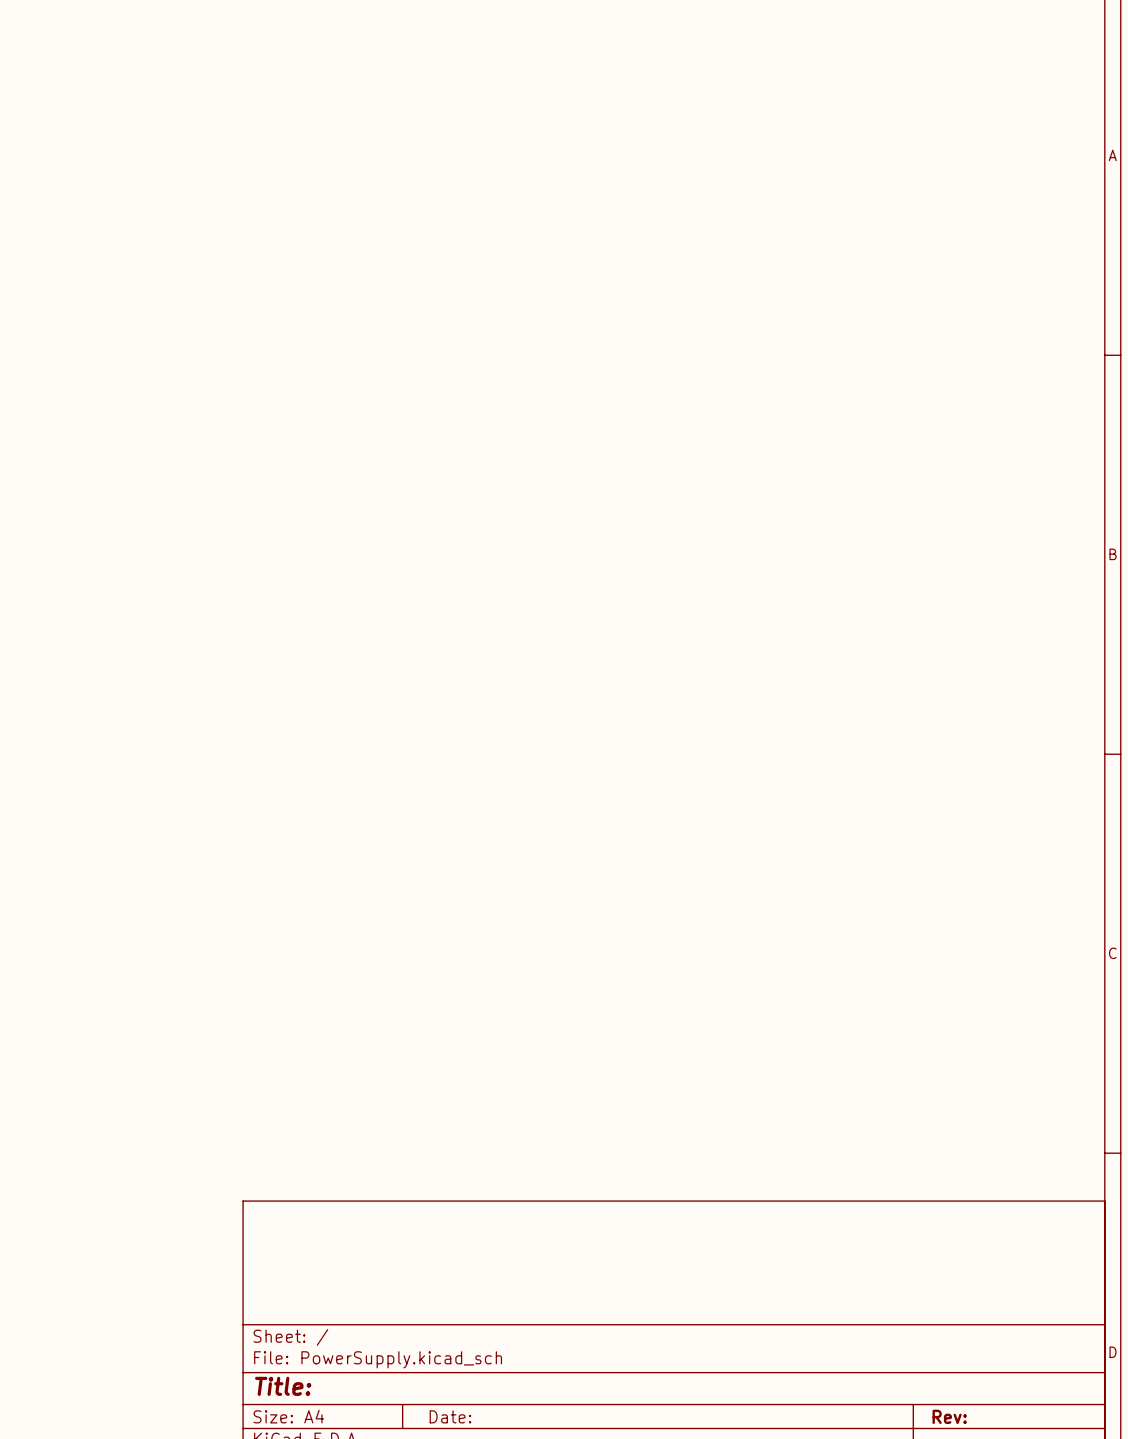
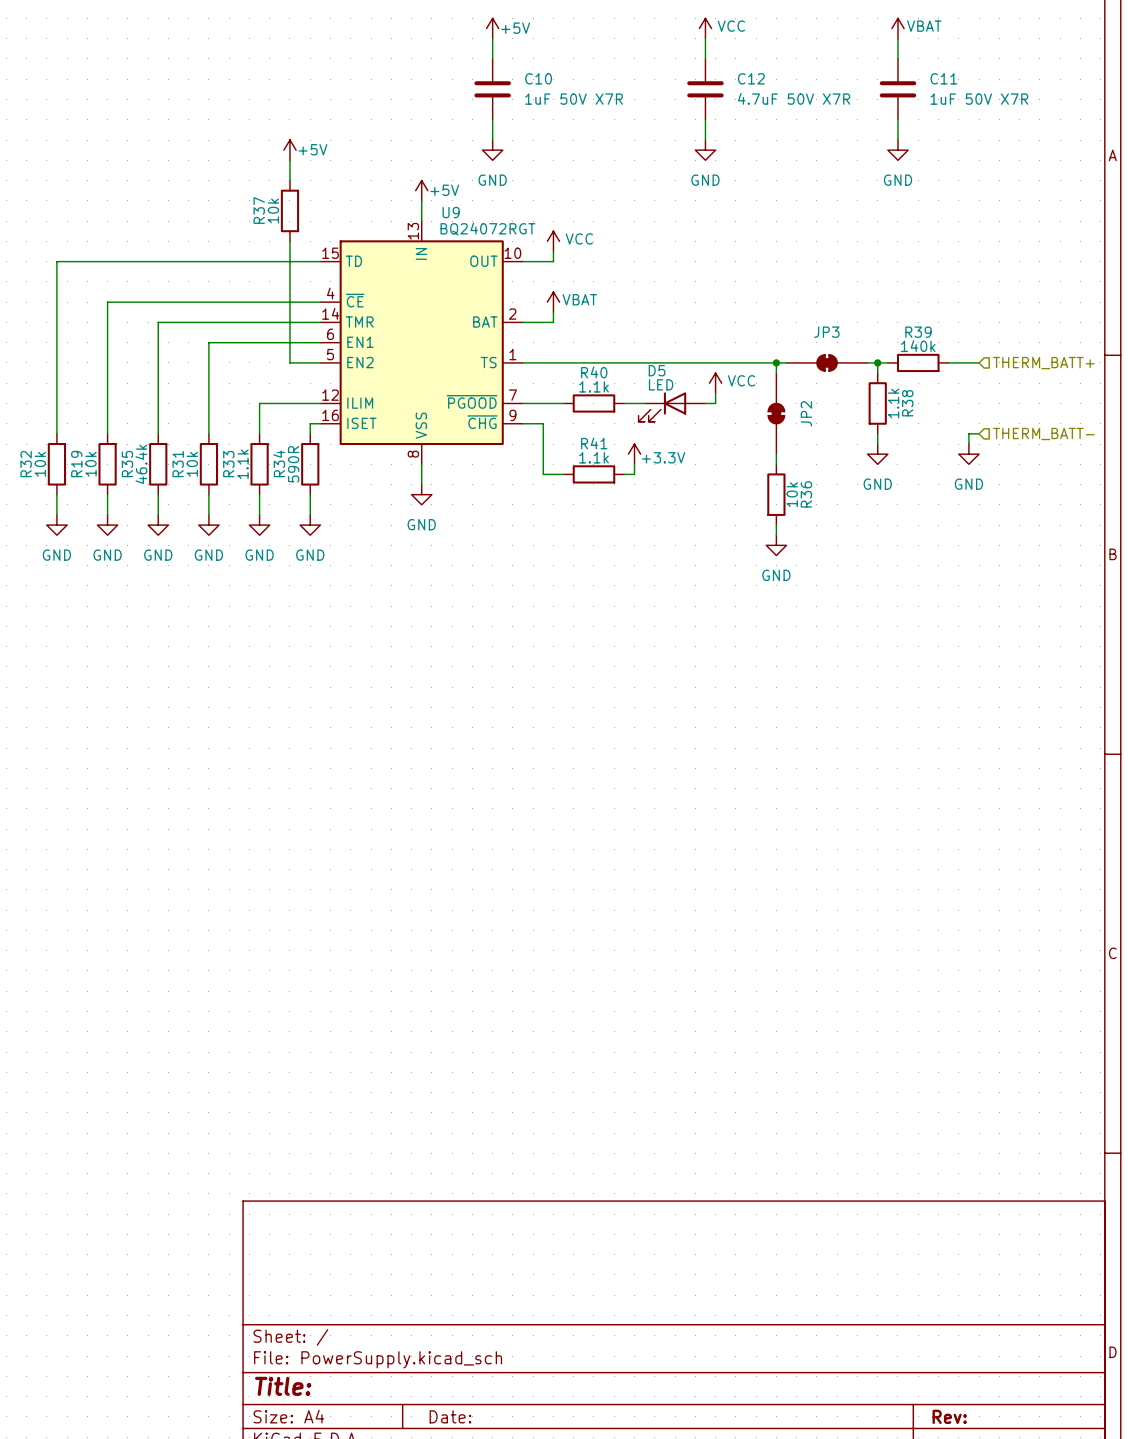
power symbol: none -> +5V (492, 28)
power symbol: none -> VCC (705, 28)
power symbol: none -> VBAT (897, 28)
wire: none -> (492, 38) (492, 58)
wire: none -> (705, 38) (705, 58)
wire: none -> (897, 38) (897, 58)
C10: none -> 1uF 50V X7R (492, 89)
C12: none -> 4.7uF 50V X7R (705, 89)
C11: none -> 1uF 50V X7R (897, 89)
wire: none -> (492, 119) (492, 140)
wire: none -> (705, 119) (705, 140)
wire: none -> (897, 119) (897, 140)
power symbol: none -> +5V (289, 150)
power symbol: none -> GND (492, 150)
power symbol: none -> GND (705, 150)
power symbol: none -> GND (897, 150)
wire: none -> (289, 160) (289, 180)
power symbol: none -> +5V (421, 190)
wire: none -> (421, 200) (421, 221)
R37: none -> 10k (289, 210)
wire: none -> (289, 241) (289, 362) (320, 362)
power symbol: none -> VCC (553, 241)
wire: none -> (553, 251) (553, 261) (523, 261)
wire: none -> (320, 261) (56, 261) (56, 433)
wire: none -> (320, 302) (107, 302) (107, 433)
power symbol: none -> VBAT (553, 302)
wire: none -> (553, 312) (553, 322) (523, 322)
wire: none -> (320, 322) (158, 322) (158, 433)
wire: none -> (320, 342) (208, 342) (208, 433)
U9: none -> BQ24072RGT (421, 342)
wire: none -> (523, 362) (786, 362)
wire: none -> (776, 362) (776, 373)
junction: none -> (776, 362)
JP3: none -> (827, 362)
wire: none -> (867, 362) (887, 362)
wire: none -> (877, 362) (877, 373)
junction: none -> (877, 362)
R39: none -> 140k (918, 362)
wire: none -> (948, 362) (979, 362)
hierarchical label: none -> THERM_BATT+ (1043, 363)
power symbol: none -> VCC (715, 383)
wire: none -> (715, 393) (715, 403) (705, 403)
wire: none -> (320, 403) (259, 403) (259, 433)
wire: none -> (523, 403) (563, 403)
R40: none -> 1.1k (593, 403)
wire: none -> (624, 403) (644, 403)
R38: none -> 1.1k (877, 403)
D5: none -> LED (672, 407)
JP2: none -> (776, 413)
wire: none -> (320, 423) (310, 423) (310, 433)
wire: none -> (523, 423) (543, 423) (543, 474) (563, 474)
wire: none -> (877, 433) (877, 444)
wire: none -> (979, 433) (968, 433) (968, 444)
hierarchical label: none -> THERM_BATT- (1043, 433)
power symbol: none -> +3.3V (634, 454)
wire: none -> (776, 454) (776, 464)
power symbol: none -> GND (877, 454)
power symbol: none -> GND (968, 454)
R32: none -> 10k (56, 464)
R19: none -> 10k (107, 464)
R35: none -> 46.4k (158, 464)
R31: none -> 10k (208, 464)
R33: none -> 1.1k (259, 464)
R34: none -> 590R (310, 464)
wire: none -> (421, 464) (421, 484)
wire: none -> (634, 464) (634, 474) (624, 474)
R41: none -> 1.1k (593, 474)
wire: none -> (56, 494) (56, 514)
wire: none -> (107, 494) (107, 514)
wire: none -> (158, 494) (158, 514)
wire: none -> (208, 494) (208, 514)
wire: none -> (259, 494) (259, 514)
wire: none -> (310, 494) (310, 514)
power symbol: none -> GND (421, 494)
R36: none -> 10k (776, 494)
power symbol: none -> GND (56, 525)
power symbol: none -> GND (107, 525)
power symbol: none -> GND (158, 525)
power symbol: none -> GND (208, 525)
power symbol: none -> GND (259, 525)
power symbol: none -> GND (310, 525)
wire: none -> (776, 525) (776, 535)
power symbol: none -> GND (776, 545)

